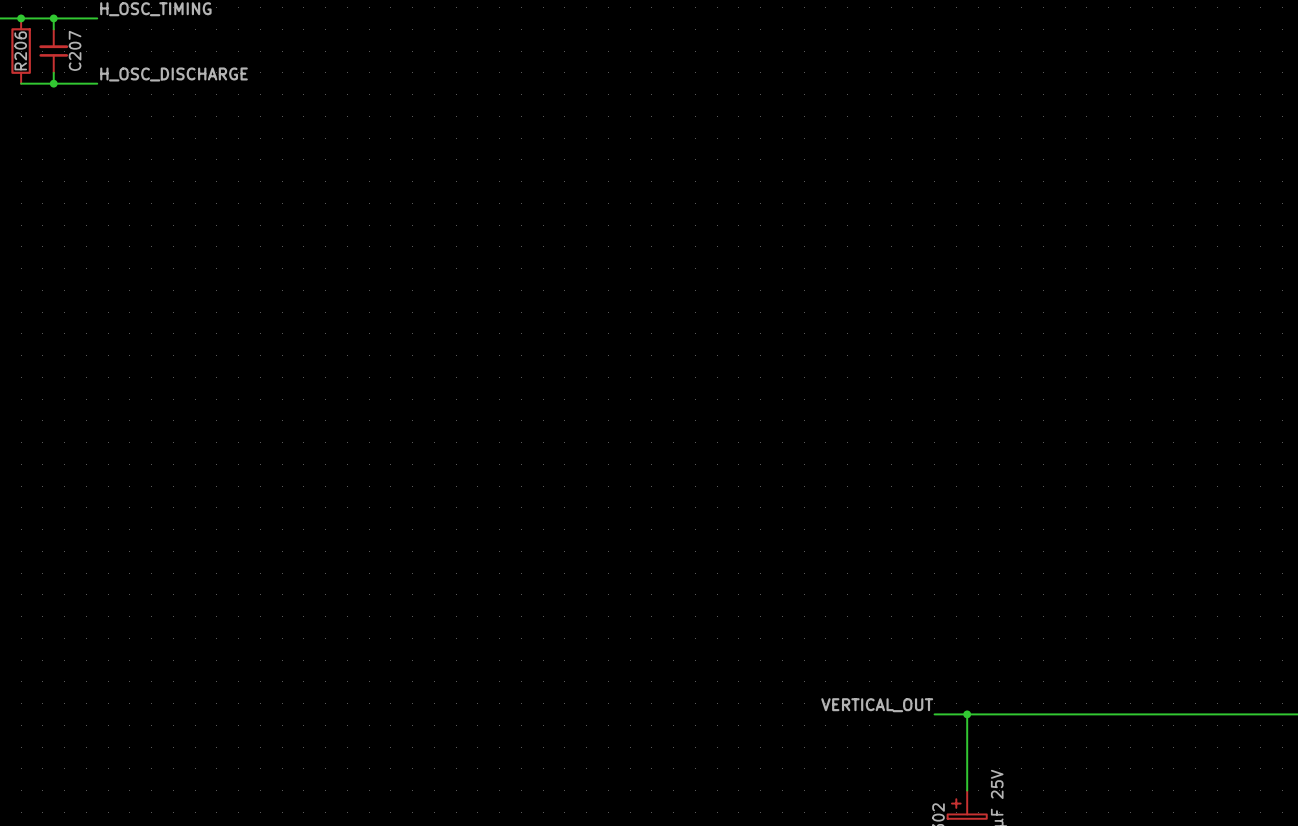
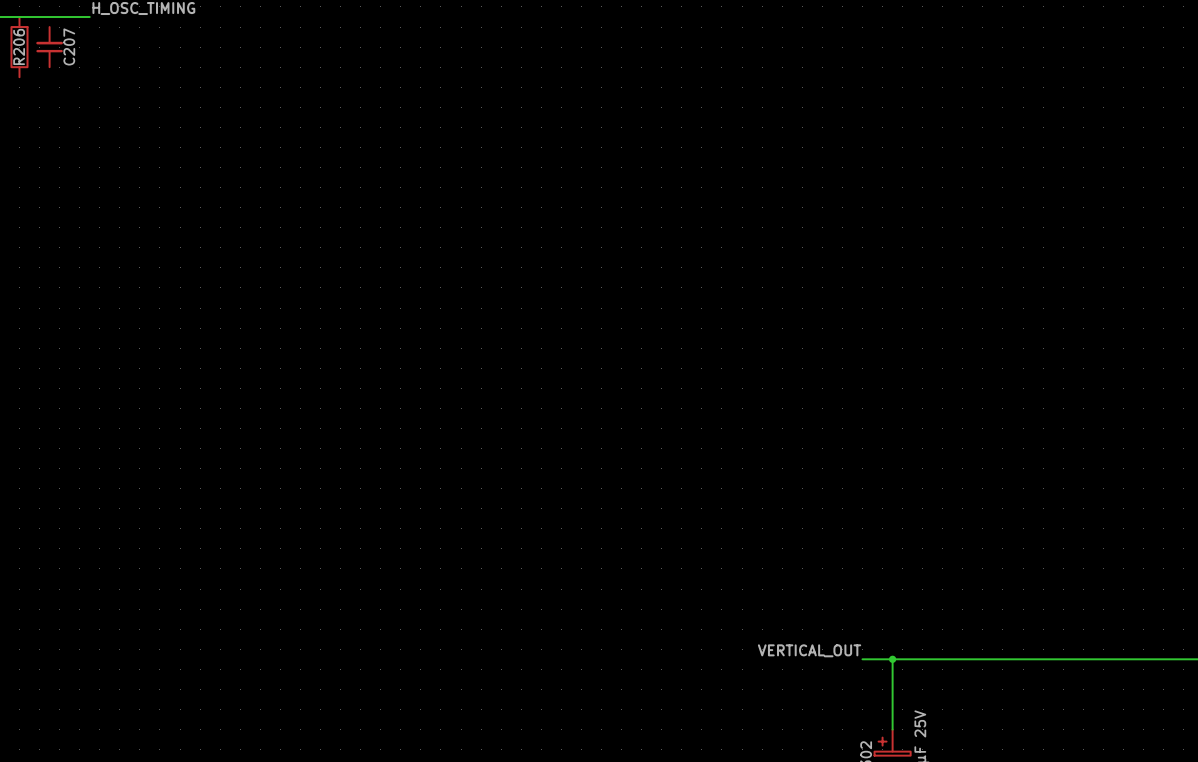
junction: (21, 18) -> none
wire: (53, 18) (53, 29) -> none
junction: (53, 18) -> none
wire: (53, 72) (53, 83) -> none
label: H_OSC_DISCHARGE (174, 74) -> none
wire: (21, 83) (97, 83) -> none
junction: (53, 83) -> none

